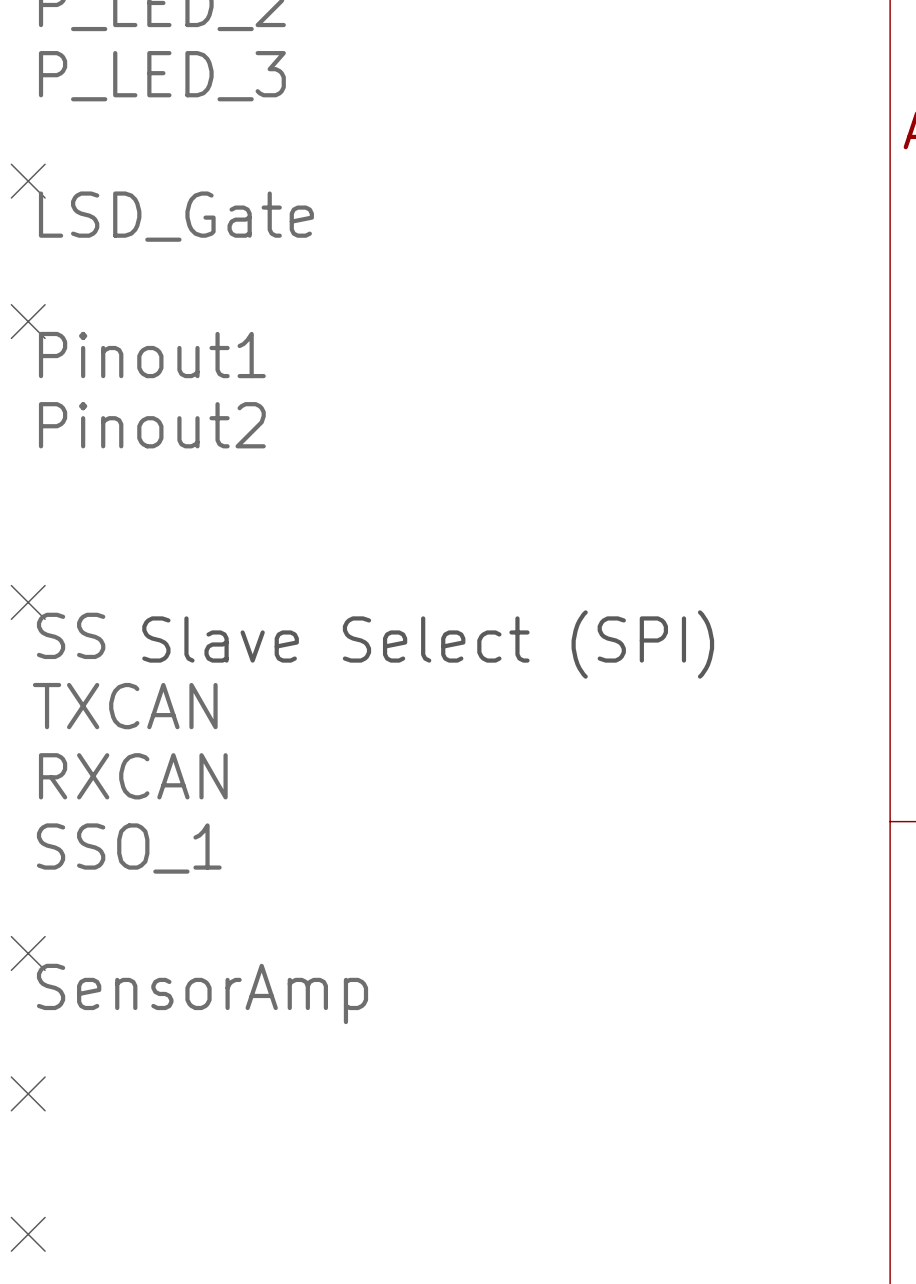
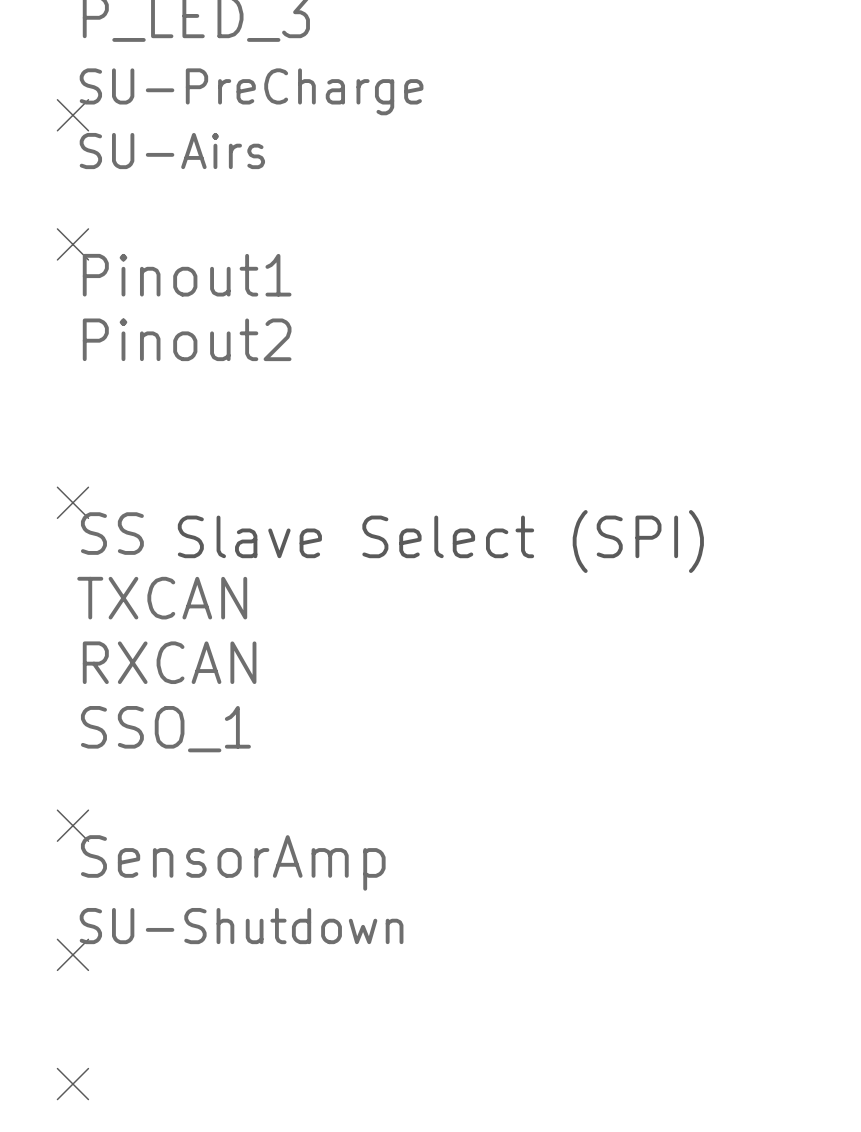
label: none -> SU-PreCharge (251, 91)
label: LSD_Gate (176, 216) -> SU-Airs (172, 151)
label: none -> SU-Shutdown (241, 926)

